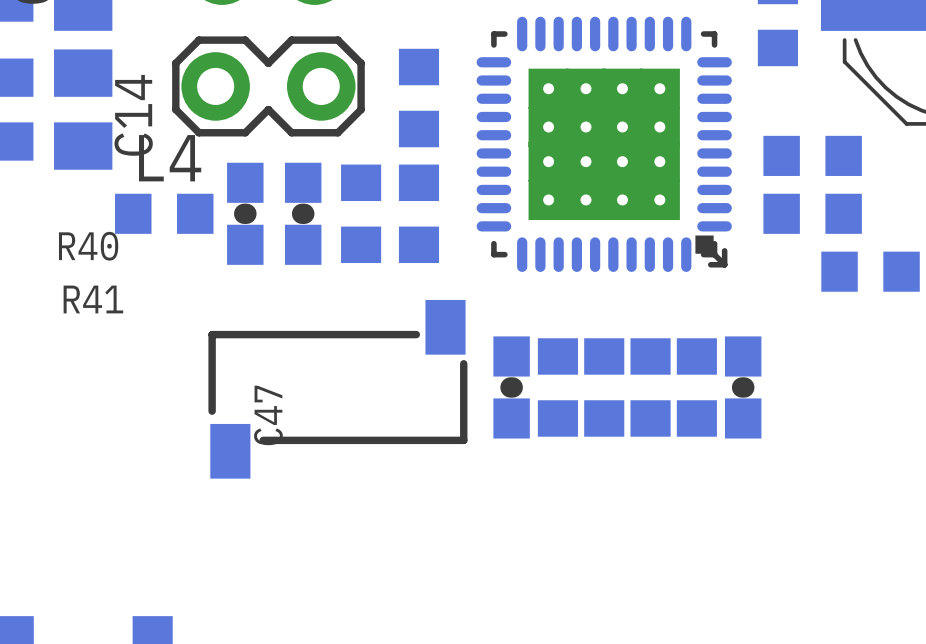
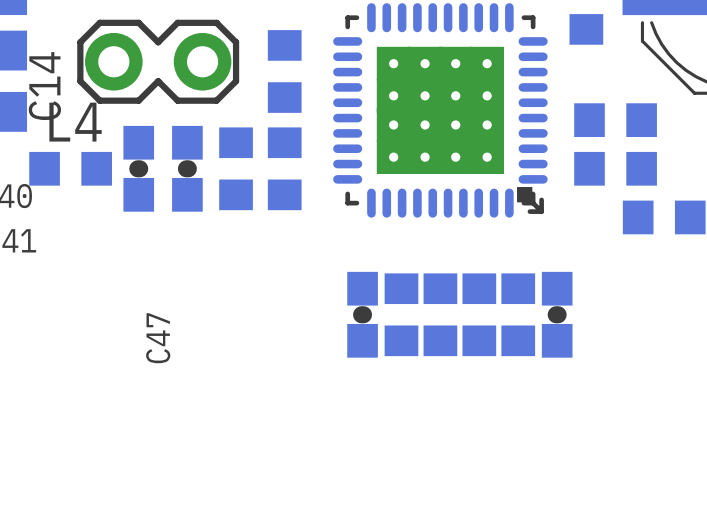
part: (337, 389) -> none

